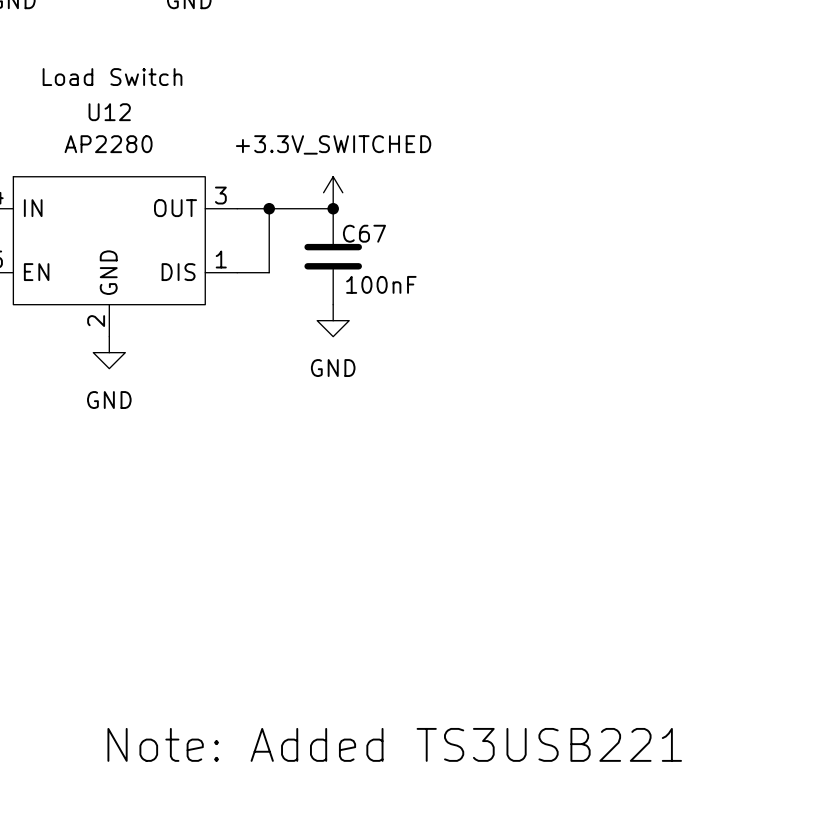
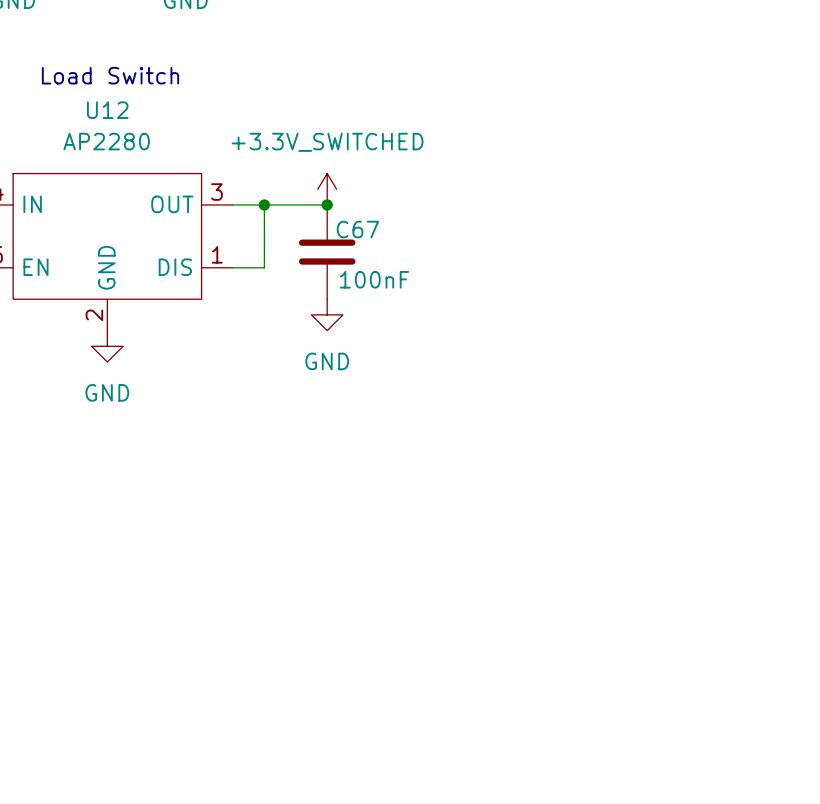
text: Note: Added TS3USB221 (394, 744) -> none

